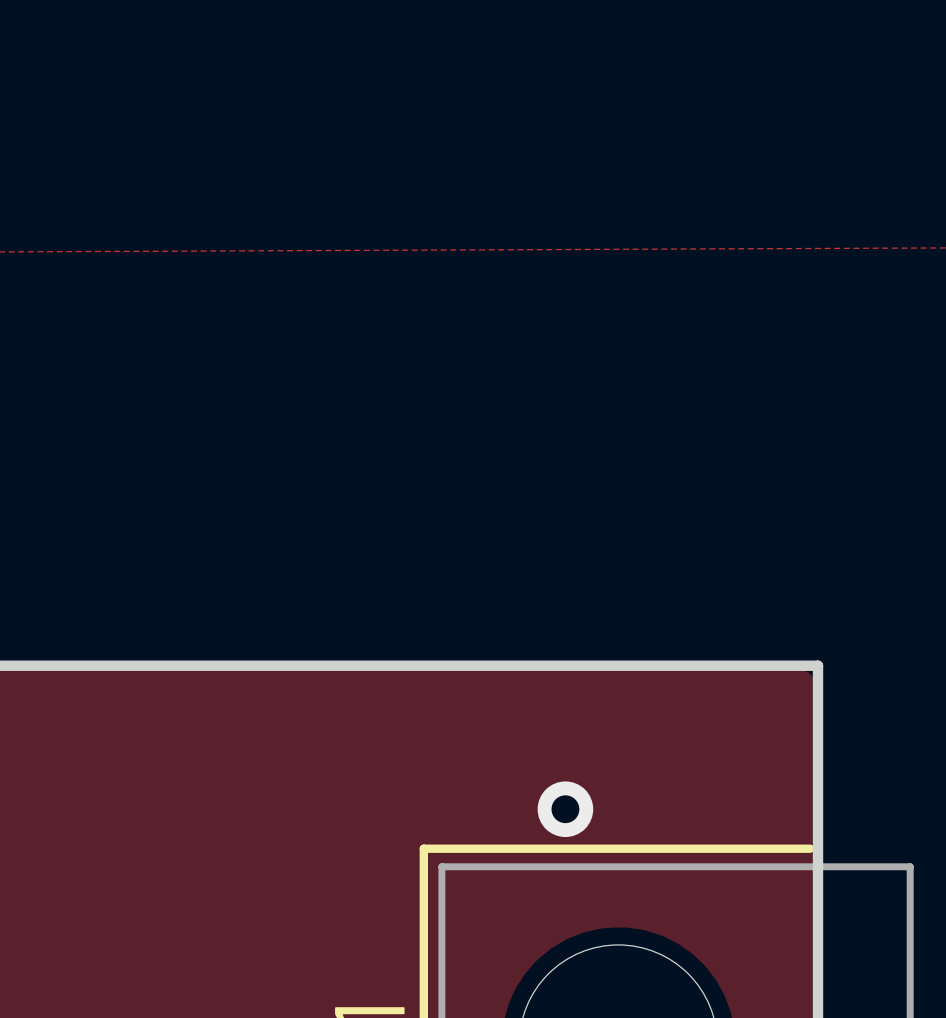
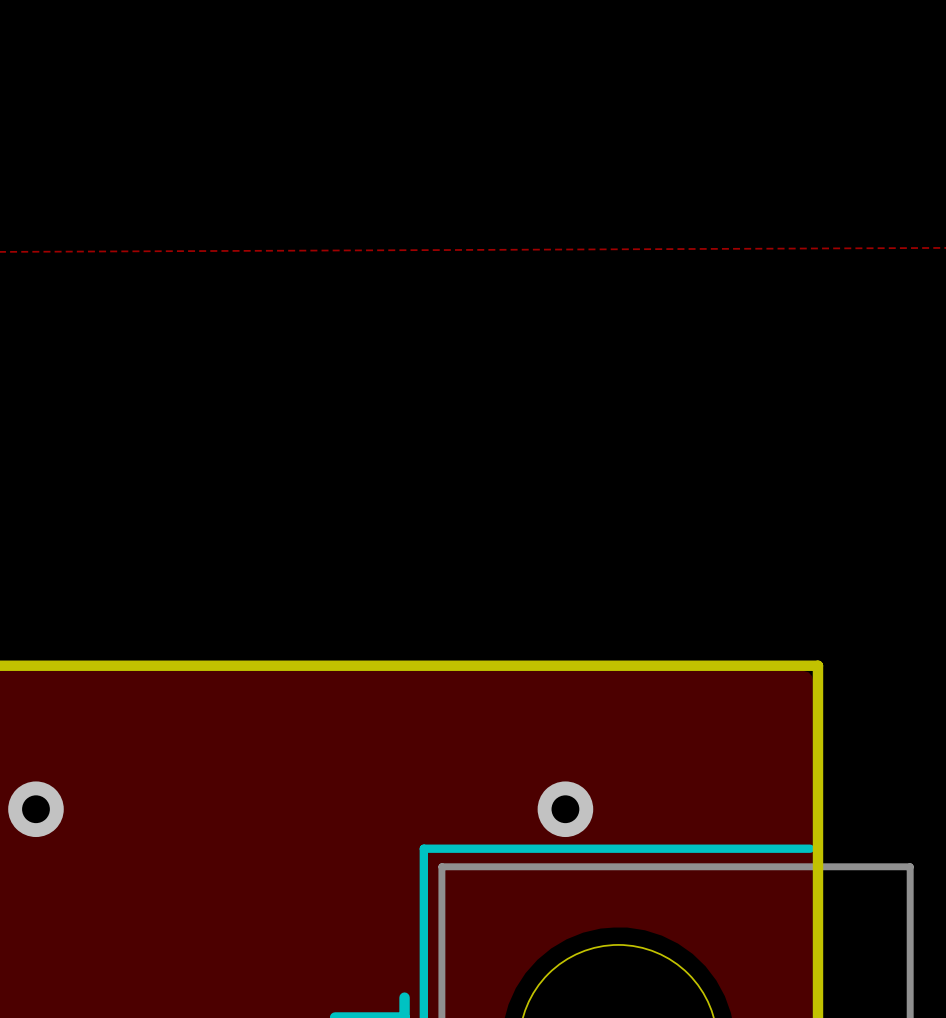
via: none -> (35, 809)

